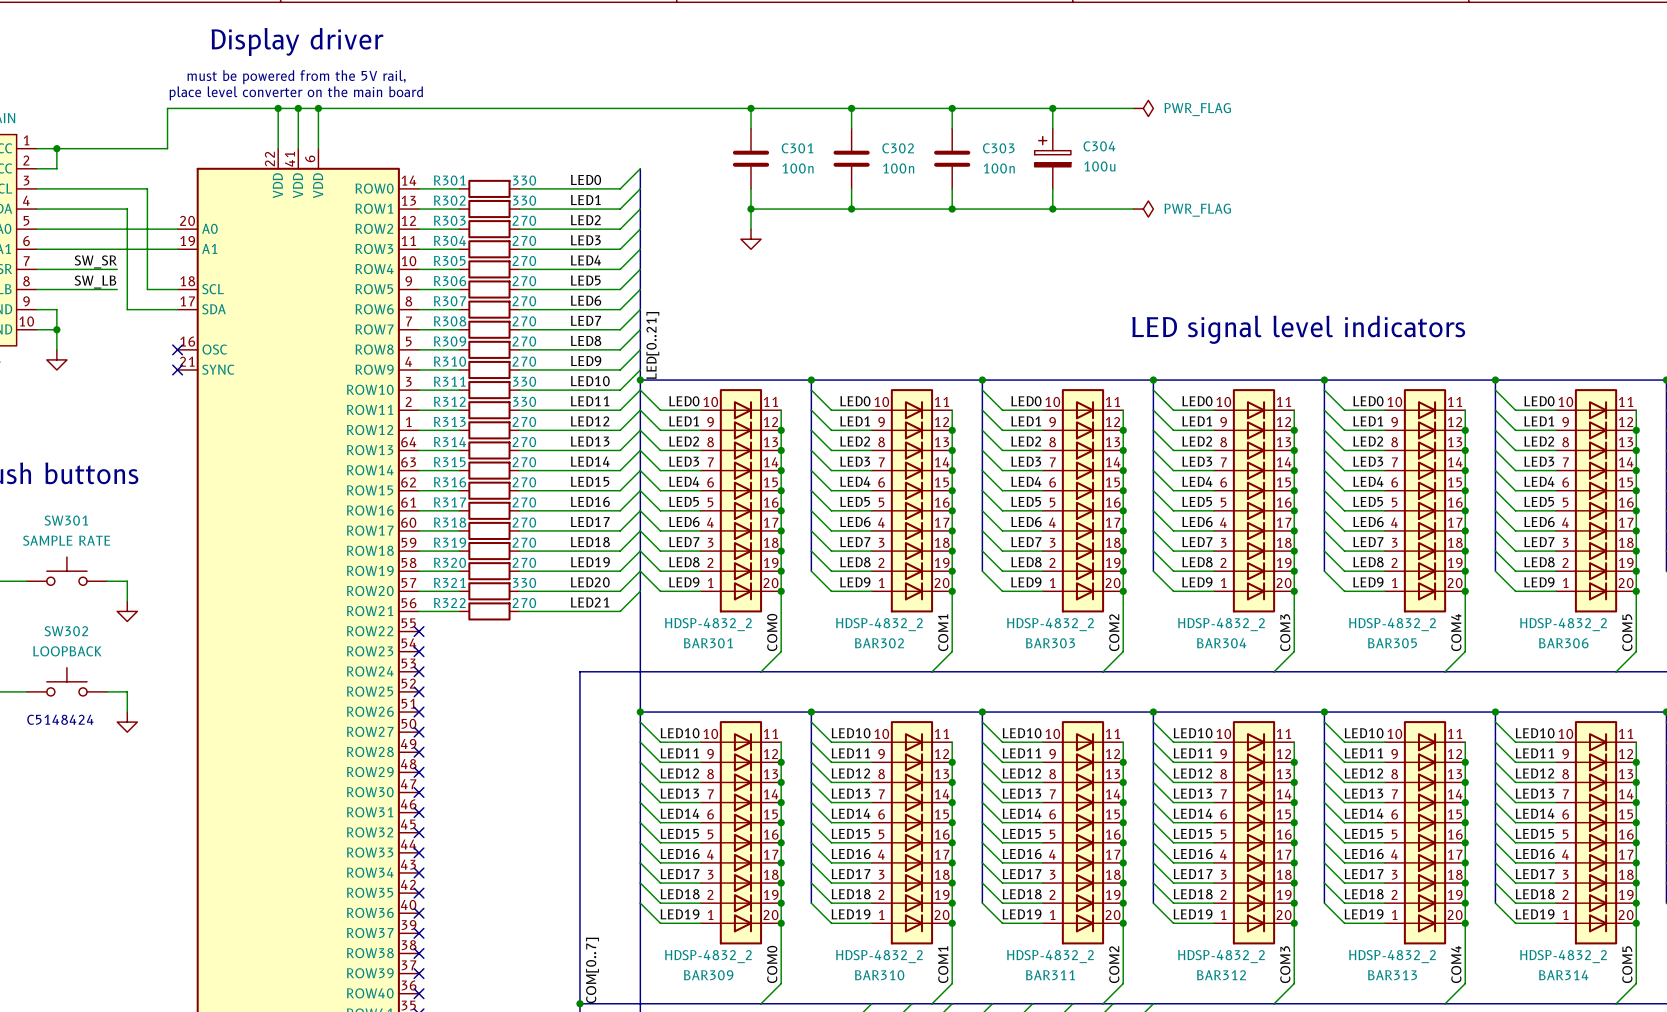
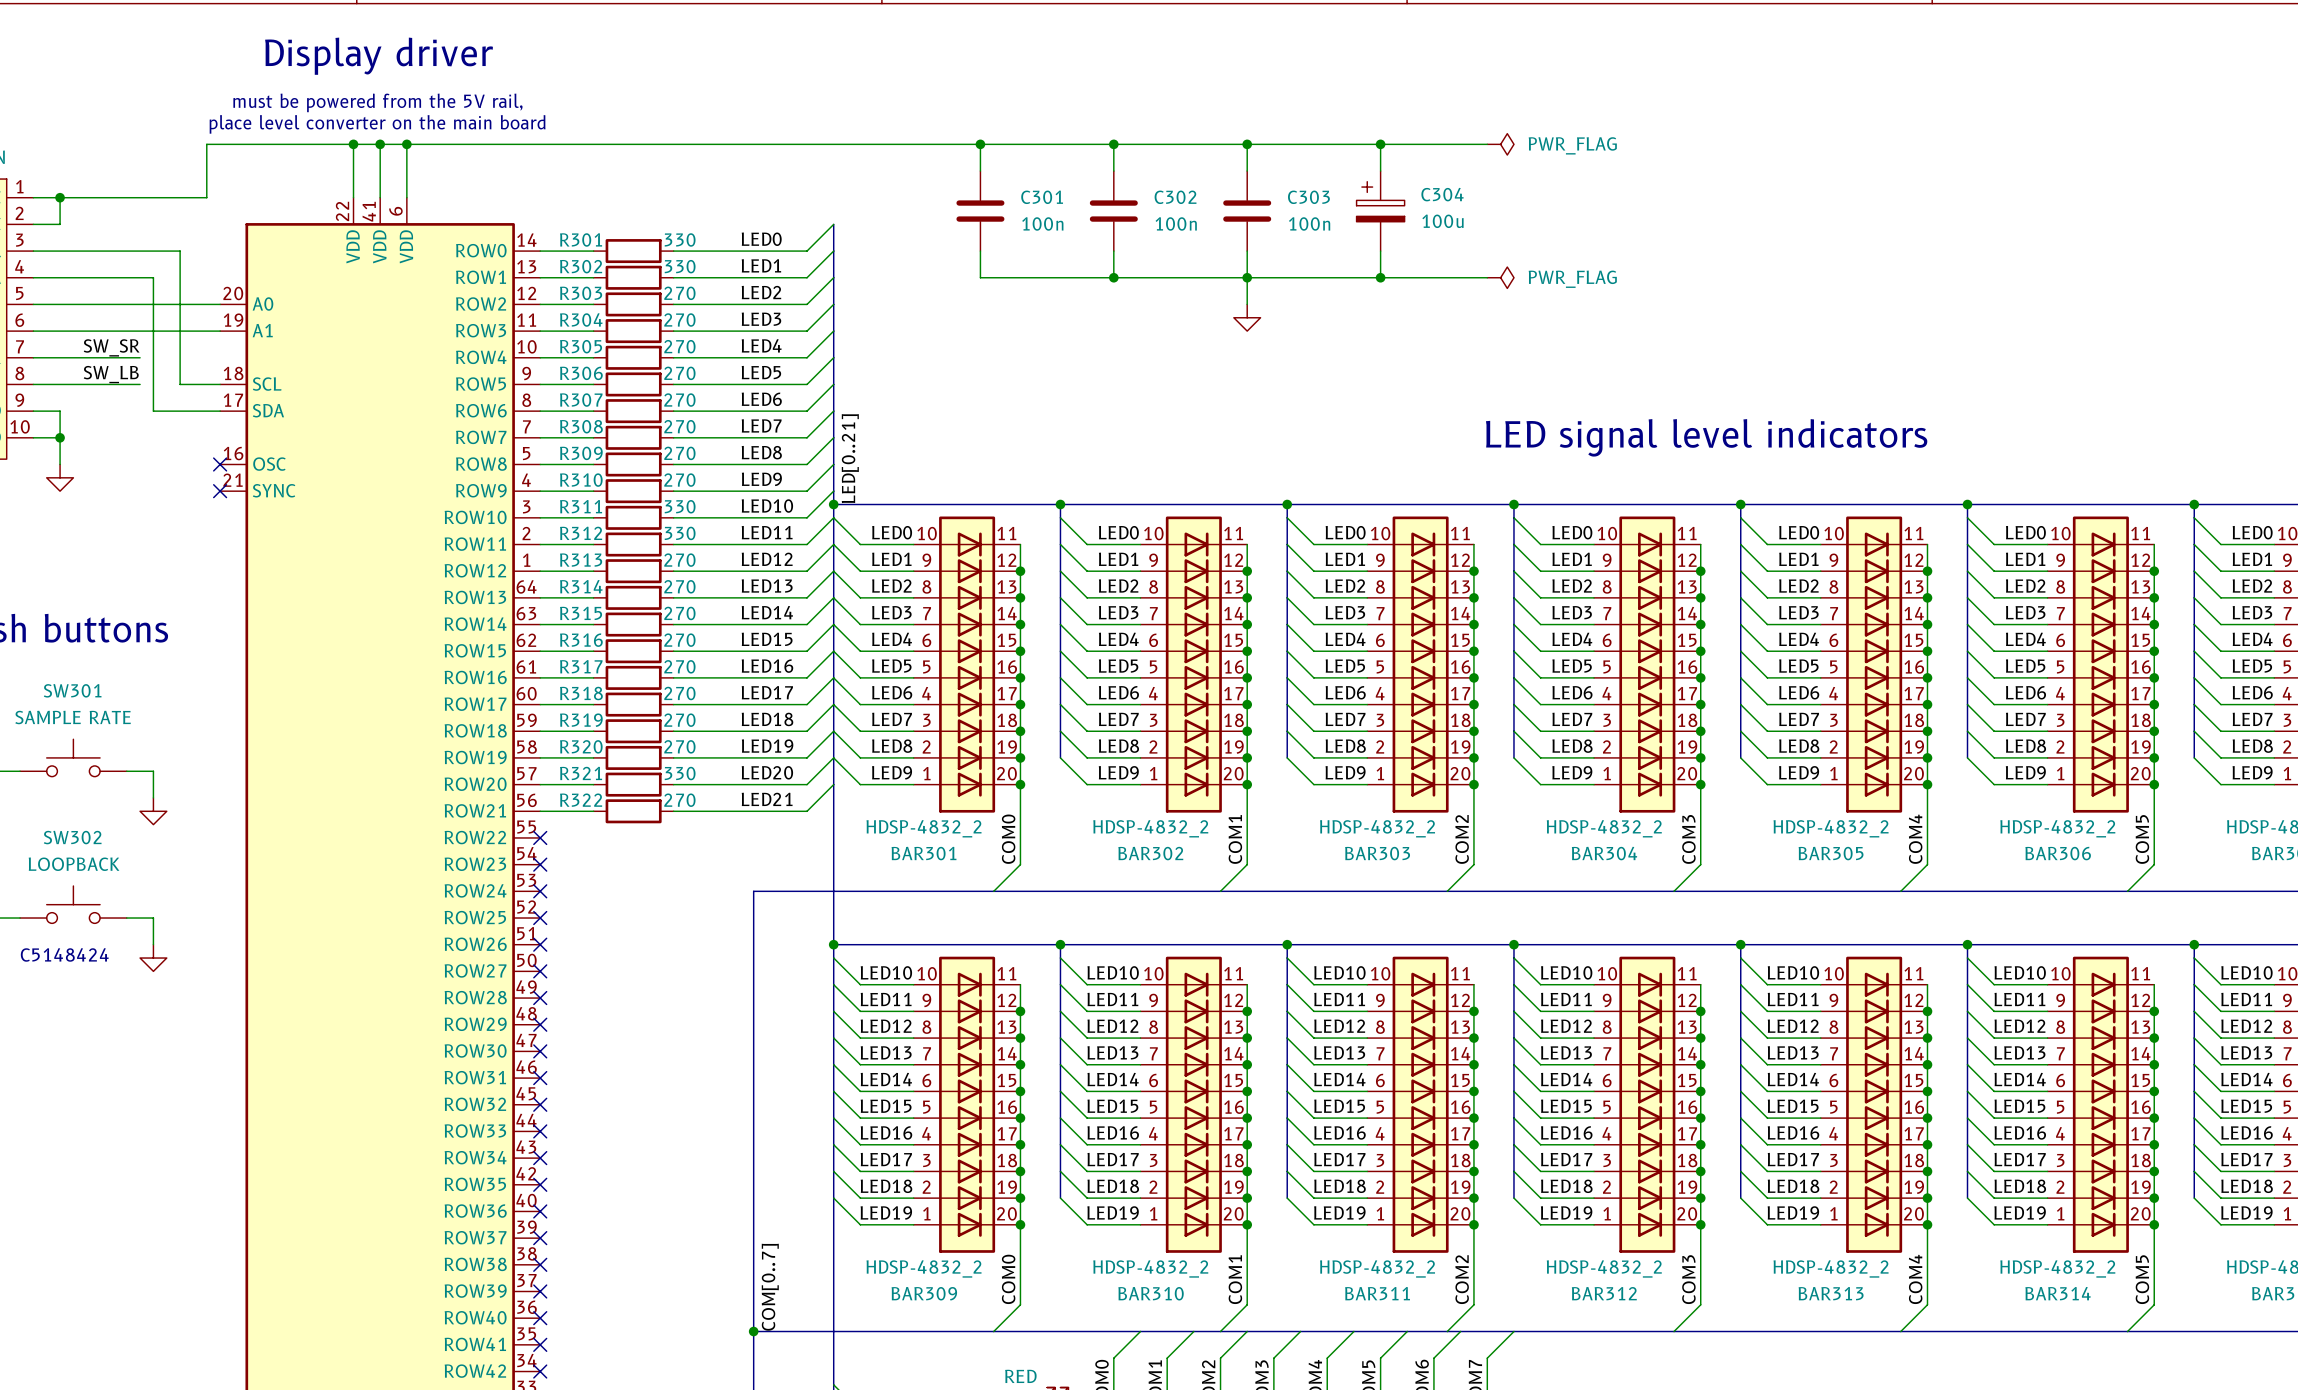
wire: (751, 209) (751, 229) -> none
junction: (751, 209) -> none
wire: none -> (1247, 277) (1247, 304)
power symbol: (751, 239) -> none
power symbol: none -> (1247, 317)

